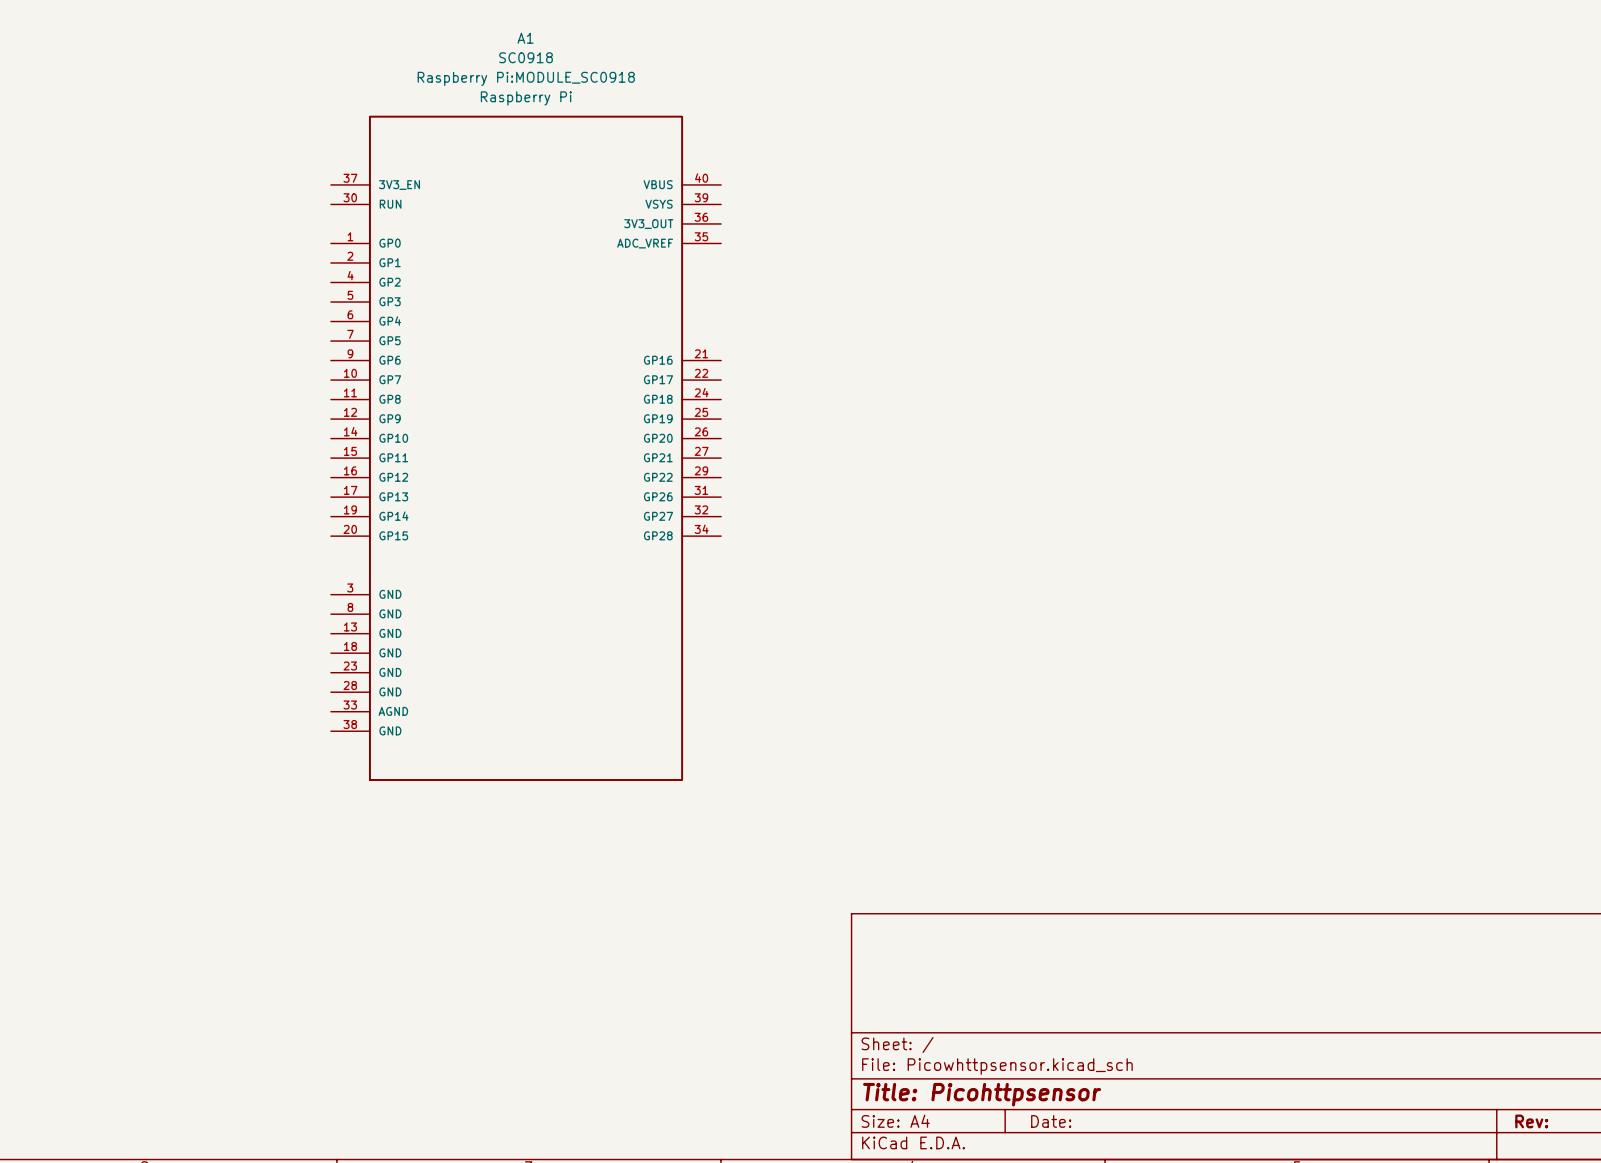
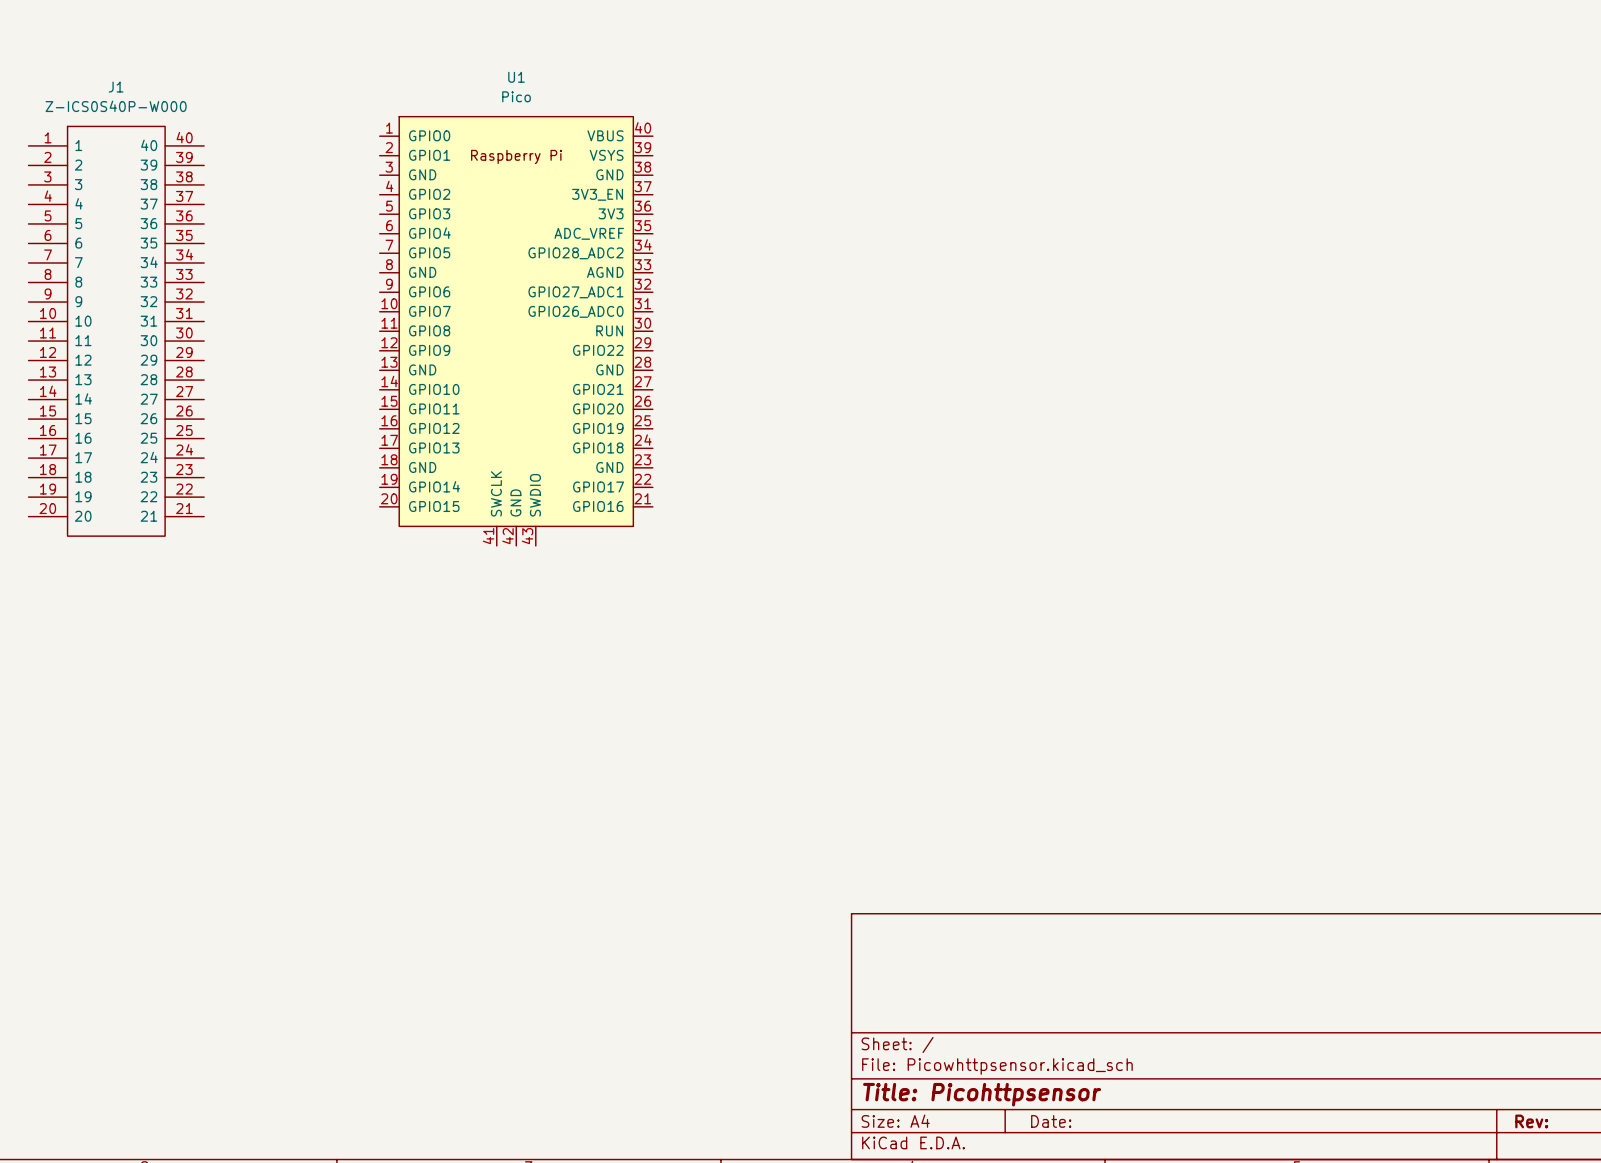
J1: none -> Z-ICS0S40P-W000 (116, 331)
U1: none -> Pico (516, 331)
A1: SC0918 (526, 448) -> none

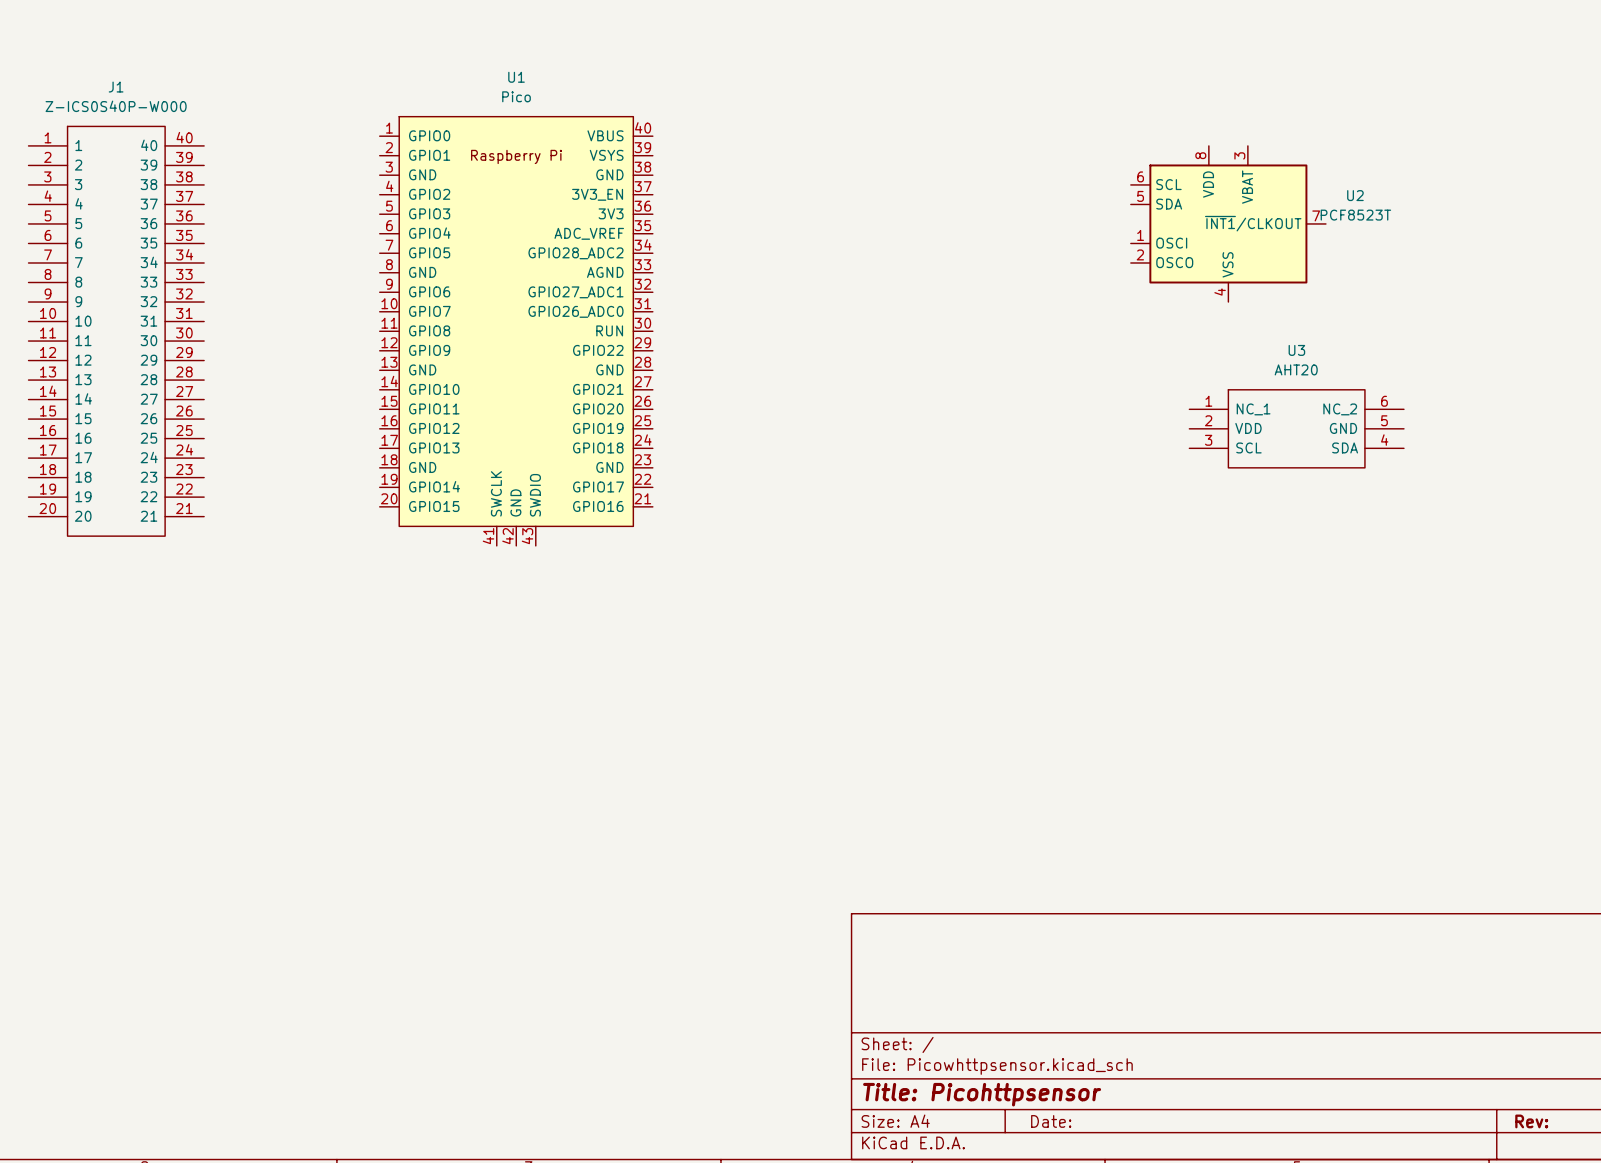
U2: none -> PCF8523T (1228, 223)
U3: none -> AHT20 (1296, 428)

